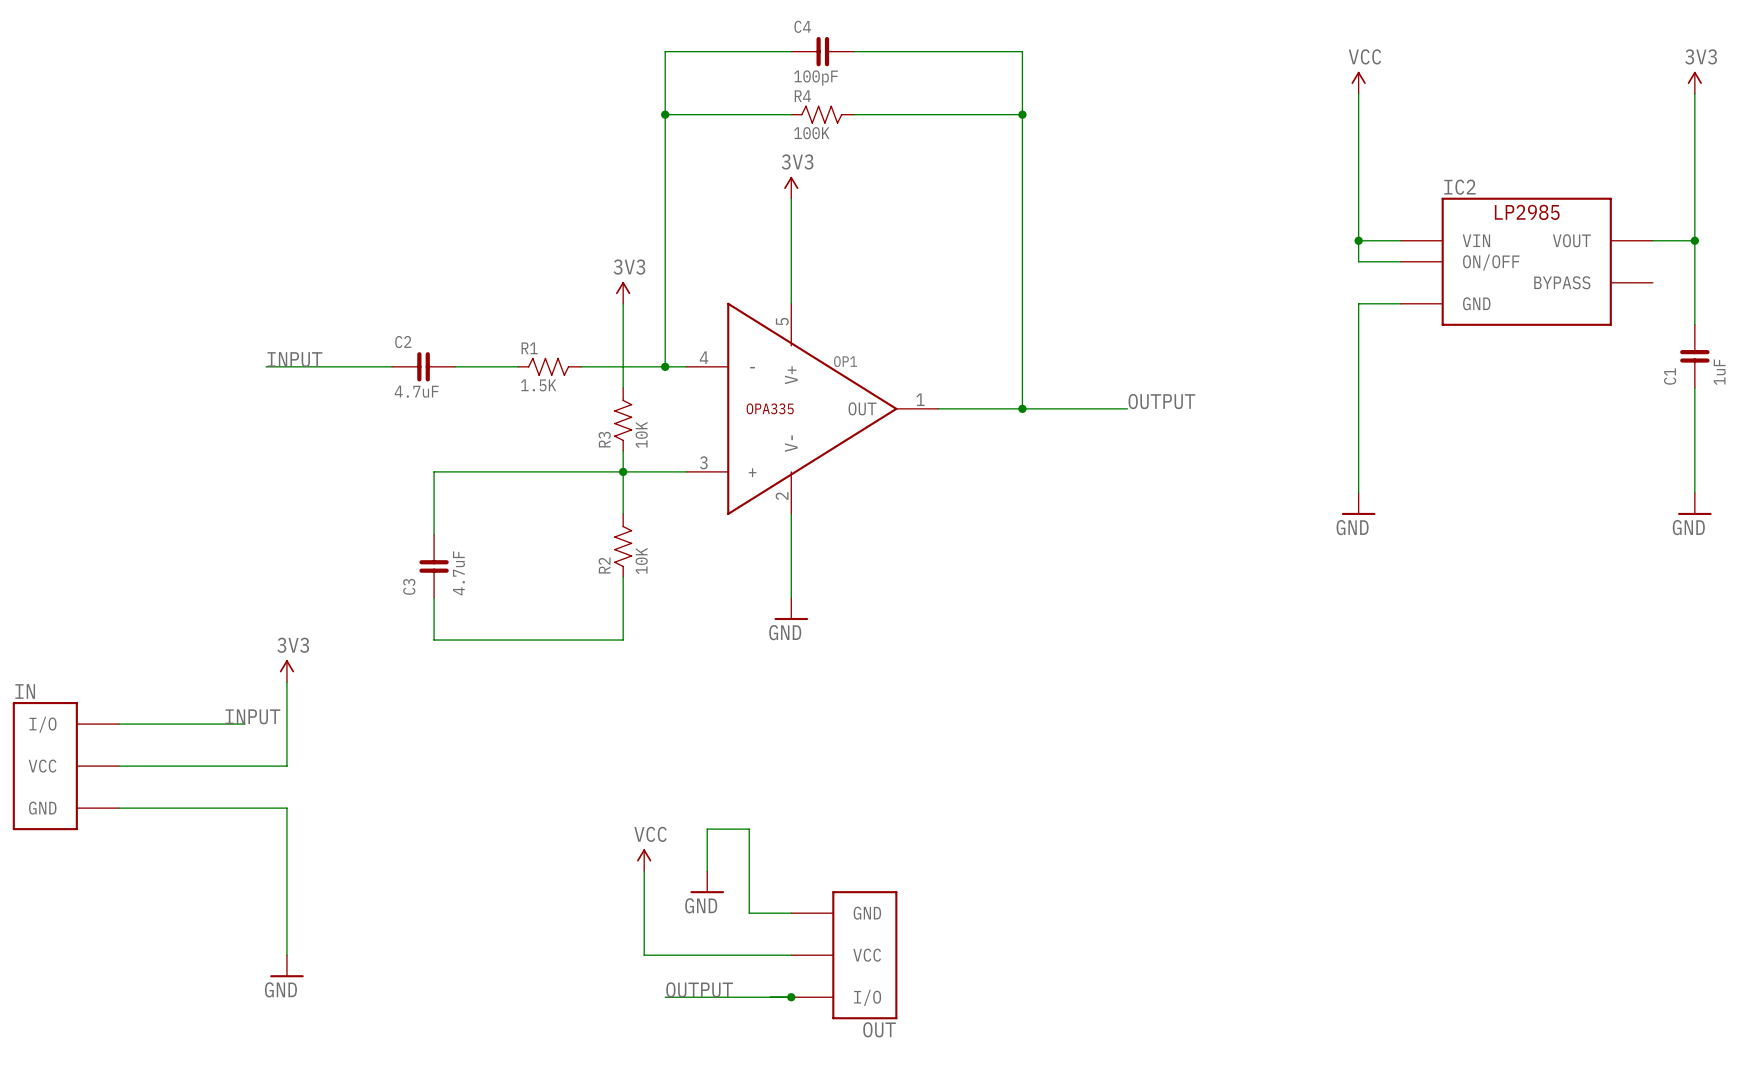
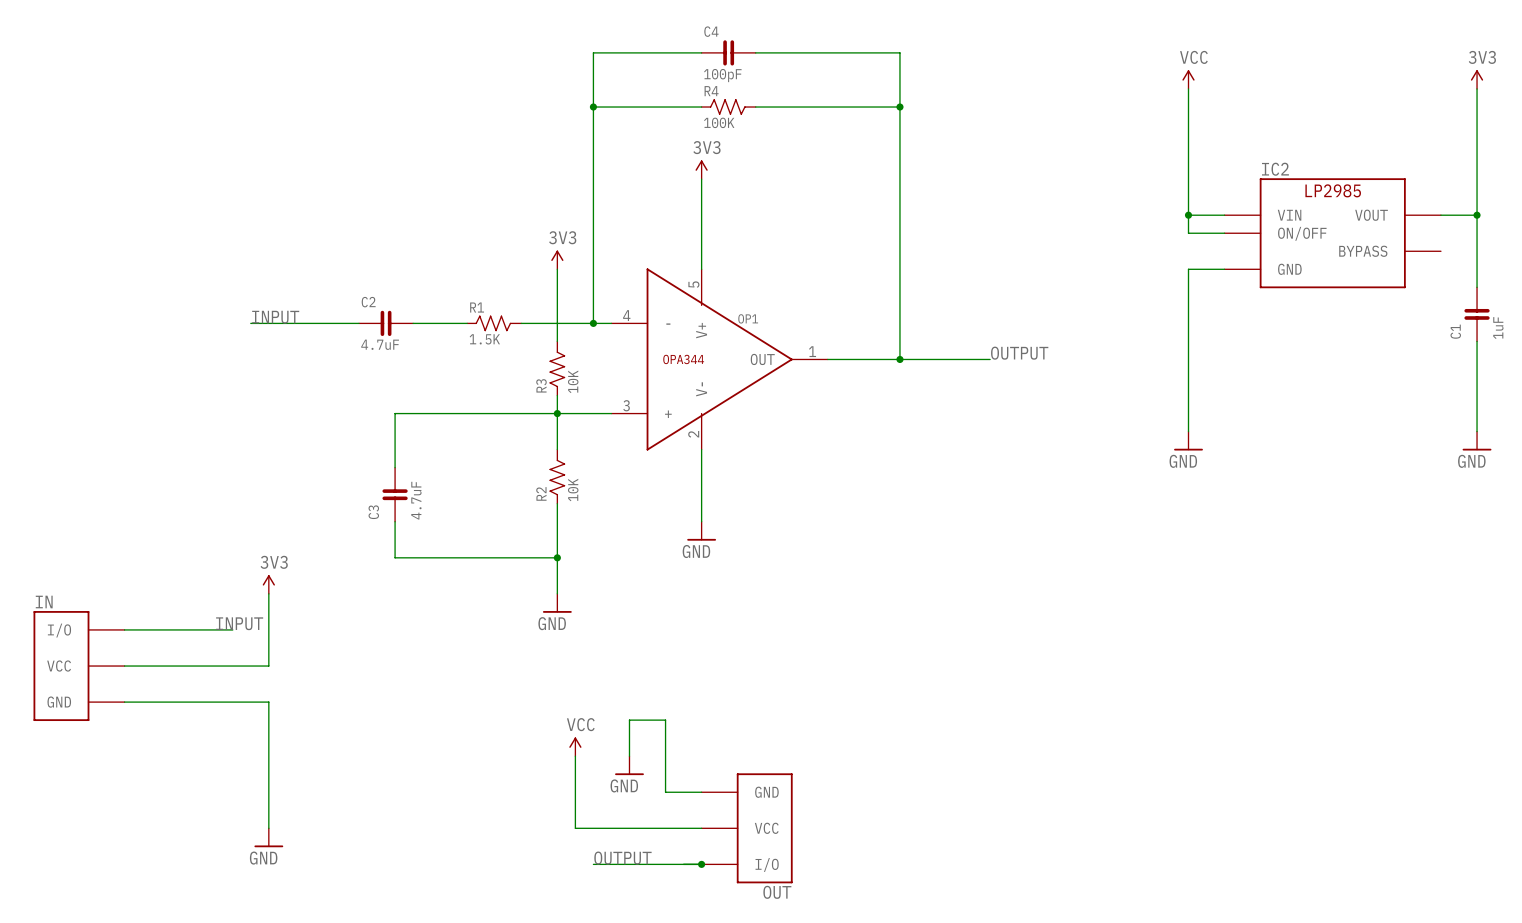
OP1 text: OPA335 (770, 408) -> OPA344 (683, 359)
wire: none -> (557, 557) (557, 593)
junction: none -> (557, 557)
power symbol: none -> GND (557, 603)

